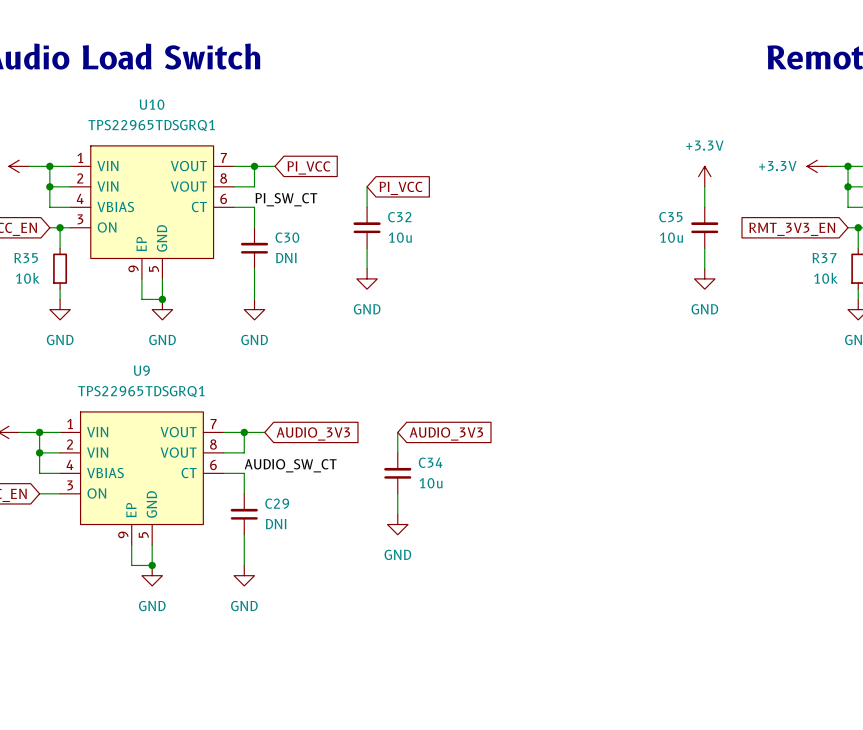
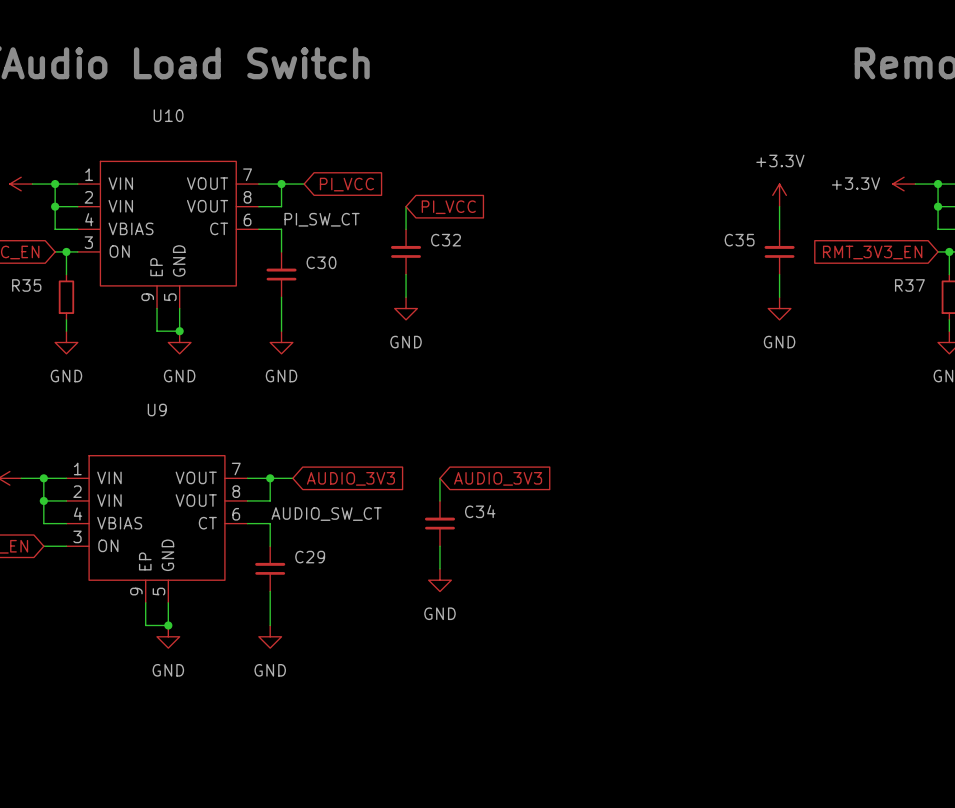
U10 value: TPS22965TDSGRQ1 (151, 125) -> none
C32 value: 10u (400, 237) -> none
C35 value: 10u (671, 237) -> none
C30 value: DNI (286, 258) -> none
R35 value: 10k (27, 278) -> none
R37 value: 10k (825, 278) -> none
U9 value: TPS22965TDSGRQ1 (141, 391) -> none
C34 value: 10u (431, 483) -> none
C29 value: DNI (276, 524) -> none

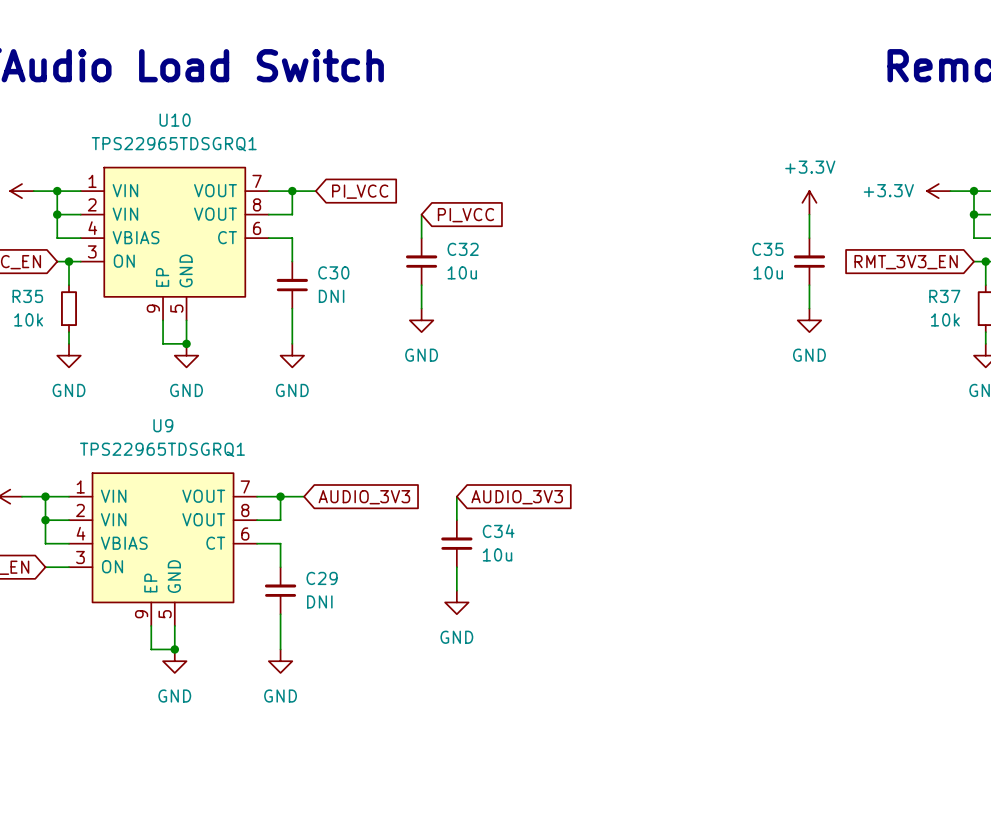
U10 value: none -> TPS22965TDSGRQ1 (174, 144)
label: PI_SW_CT (322, 219) -> none
C32 value: none -> 10u (462, 272)
C35 value: none -> 10u (768, 272)
C30 value: none -> DNI (331, 296)
R35 value: none -> 10k (28, 319)
R37 value: none -> 10k (945, 319)
U9 value: none -> TPS22965TDSGRQ1 (162, 449)
label: AUDIO_SW_CT (326, 514) -> none
C34 value: none -> 10u (497, 554)
C29 value: none -> DNI (319, 601)

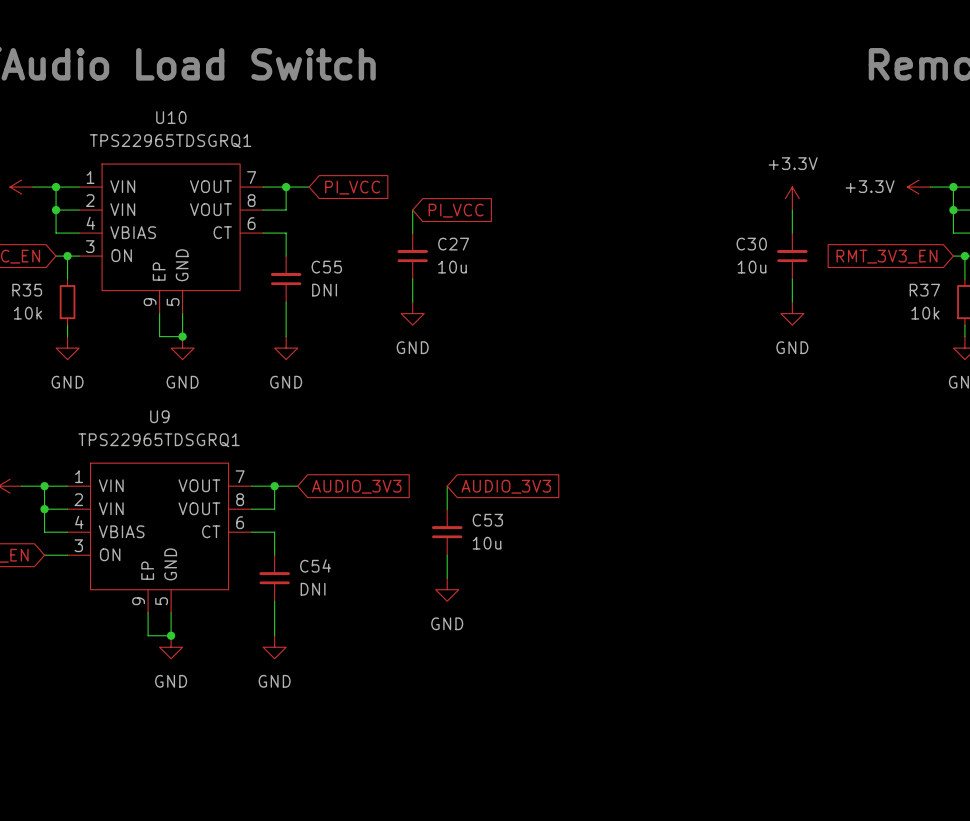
C32 name: C32 (463, 249) -> C27 (453, 244)
C35 name: C35 (767, 249) -> C30 (751, 244)
C30 name: C30 (333, 272) -> C55 (326, 267)
C34 name: C34 (498, 531) -> C53 (487, 520)
C29 name: C29 (322, 578) -> C54 (315, 565)

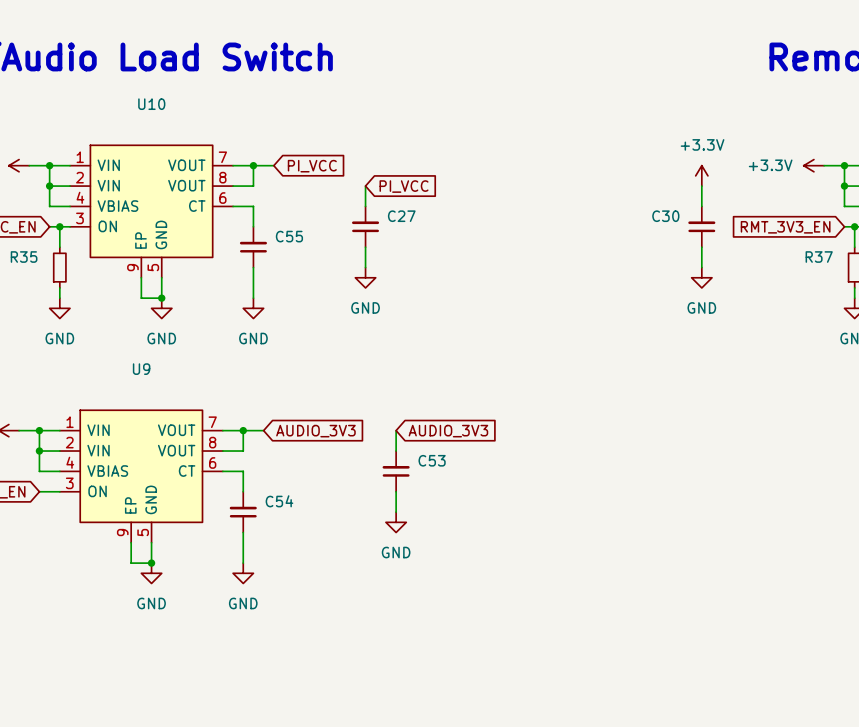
U10 value: TPS22965TDSGRQ1 (170, 141) -> none
C27 value: 10u (452, 267) -> none
C30 value: 10u (752, 267) -> none
C55 value: DNI (324, 290) -> none
R35 value: 10k (28, 313) -> none
R37 value: 10k (925, 313) -> none
U9 value: TPS22965TDSGRQ1 (159, 440) -> none
C53 value: 10u (487, 543) -> none
C54 value: DNI (313, 589) -> none

